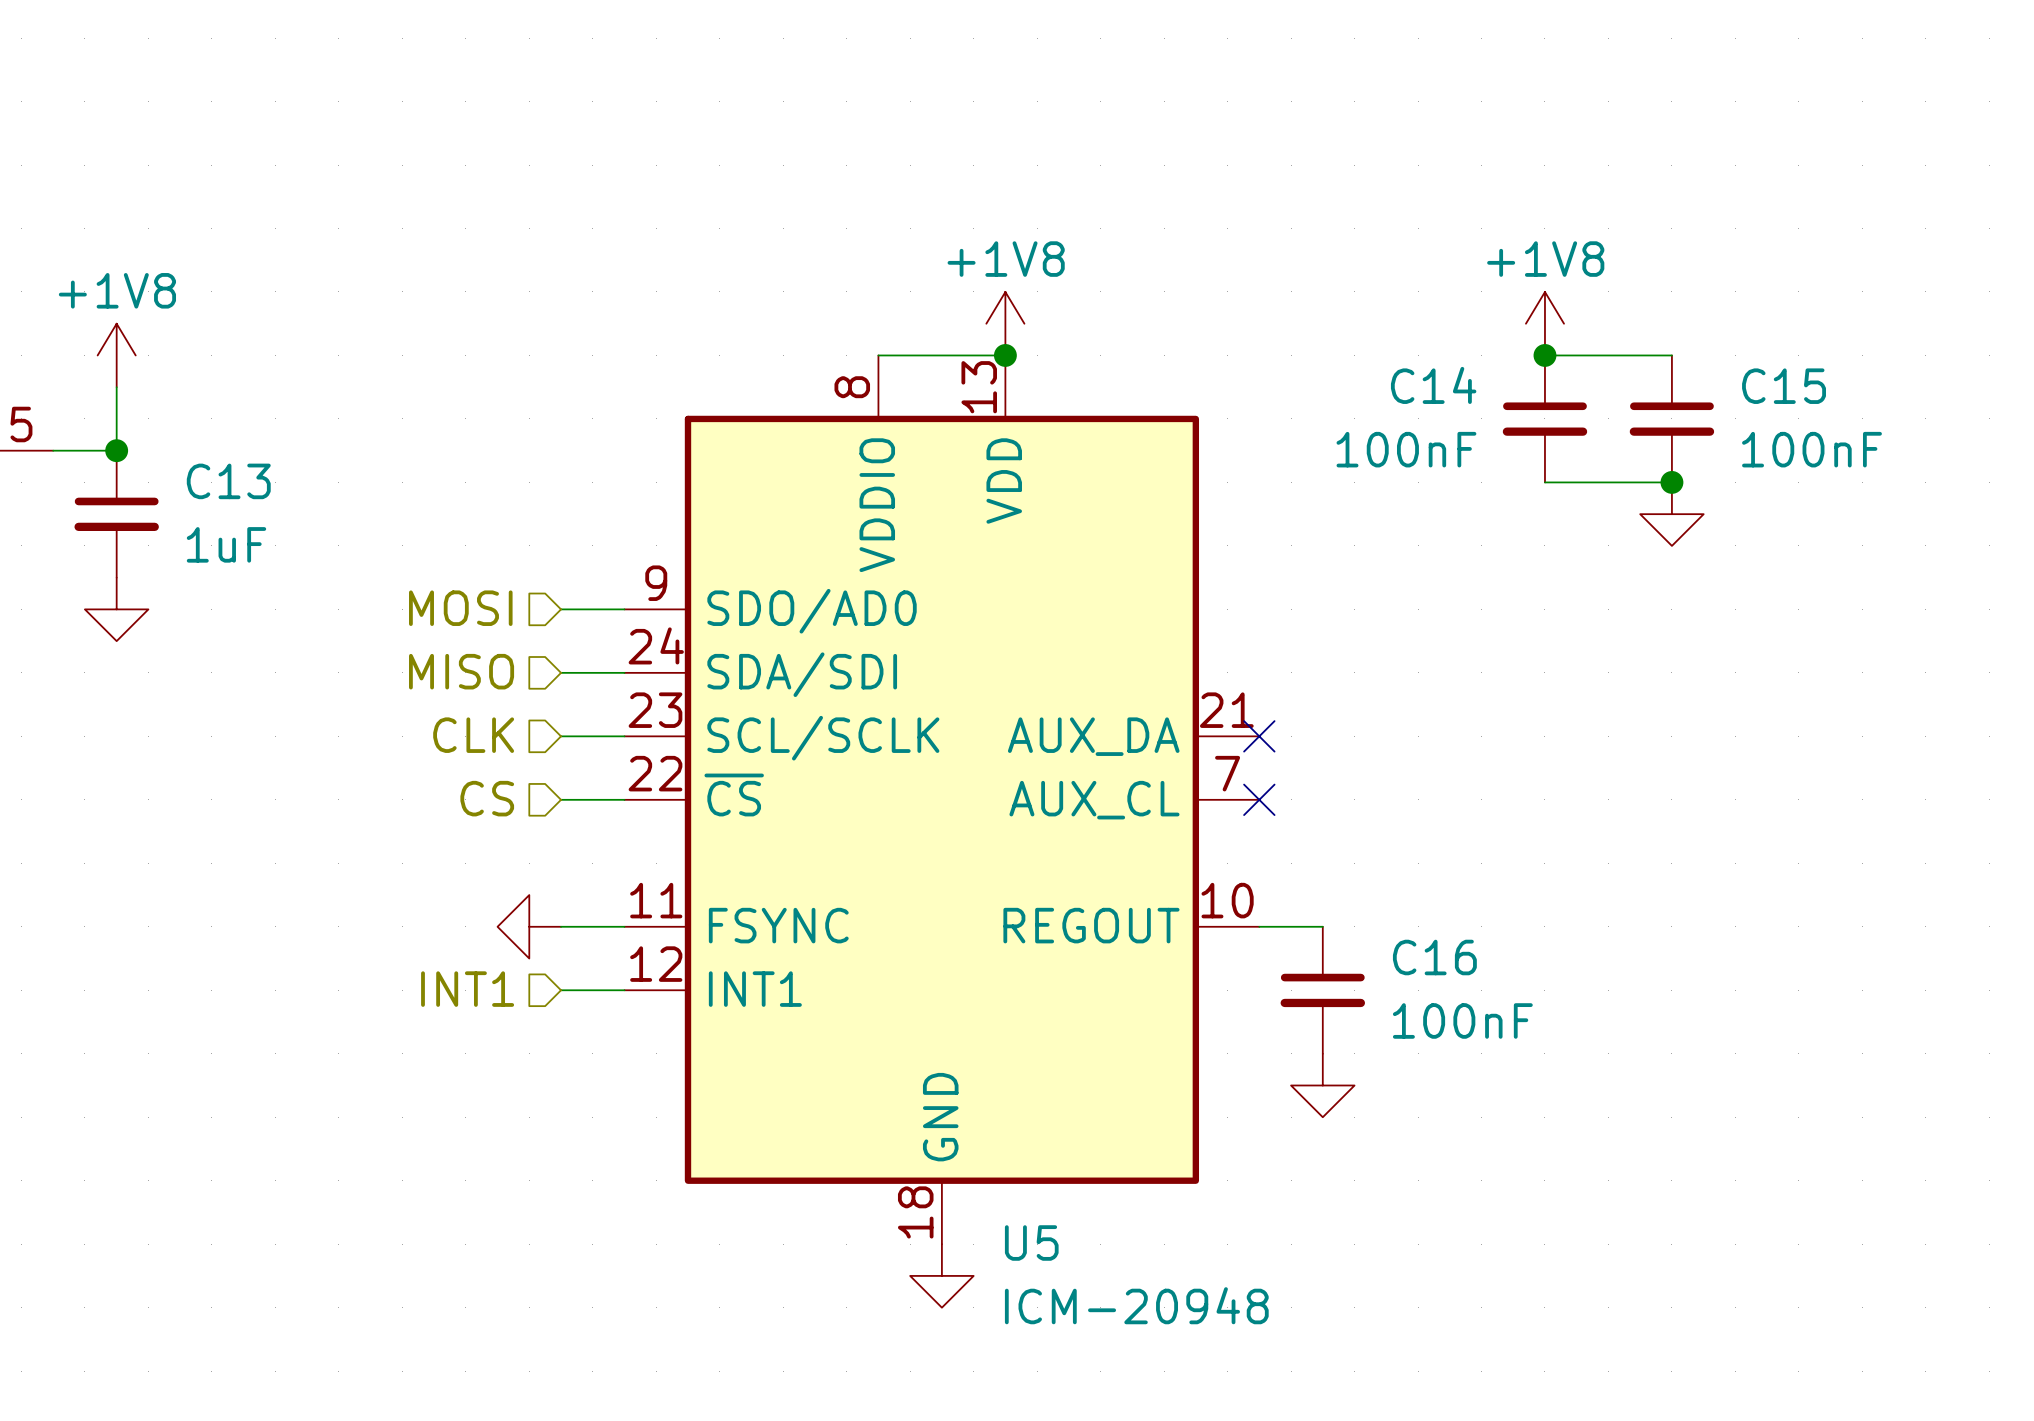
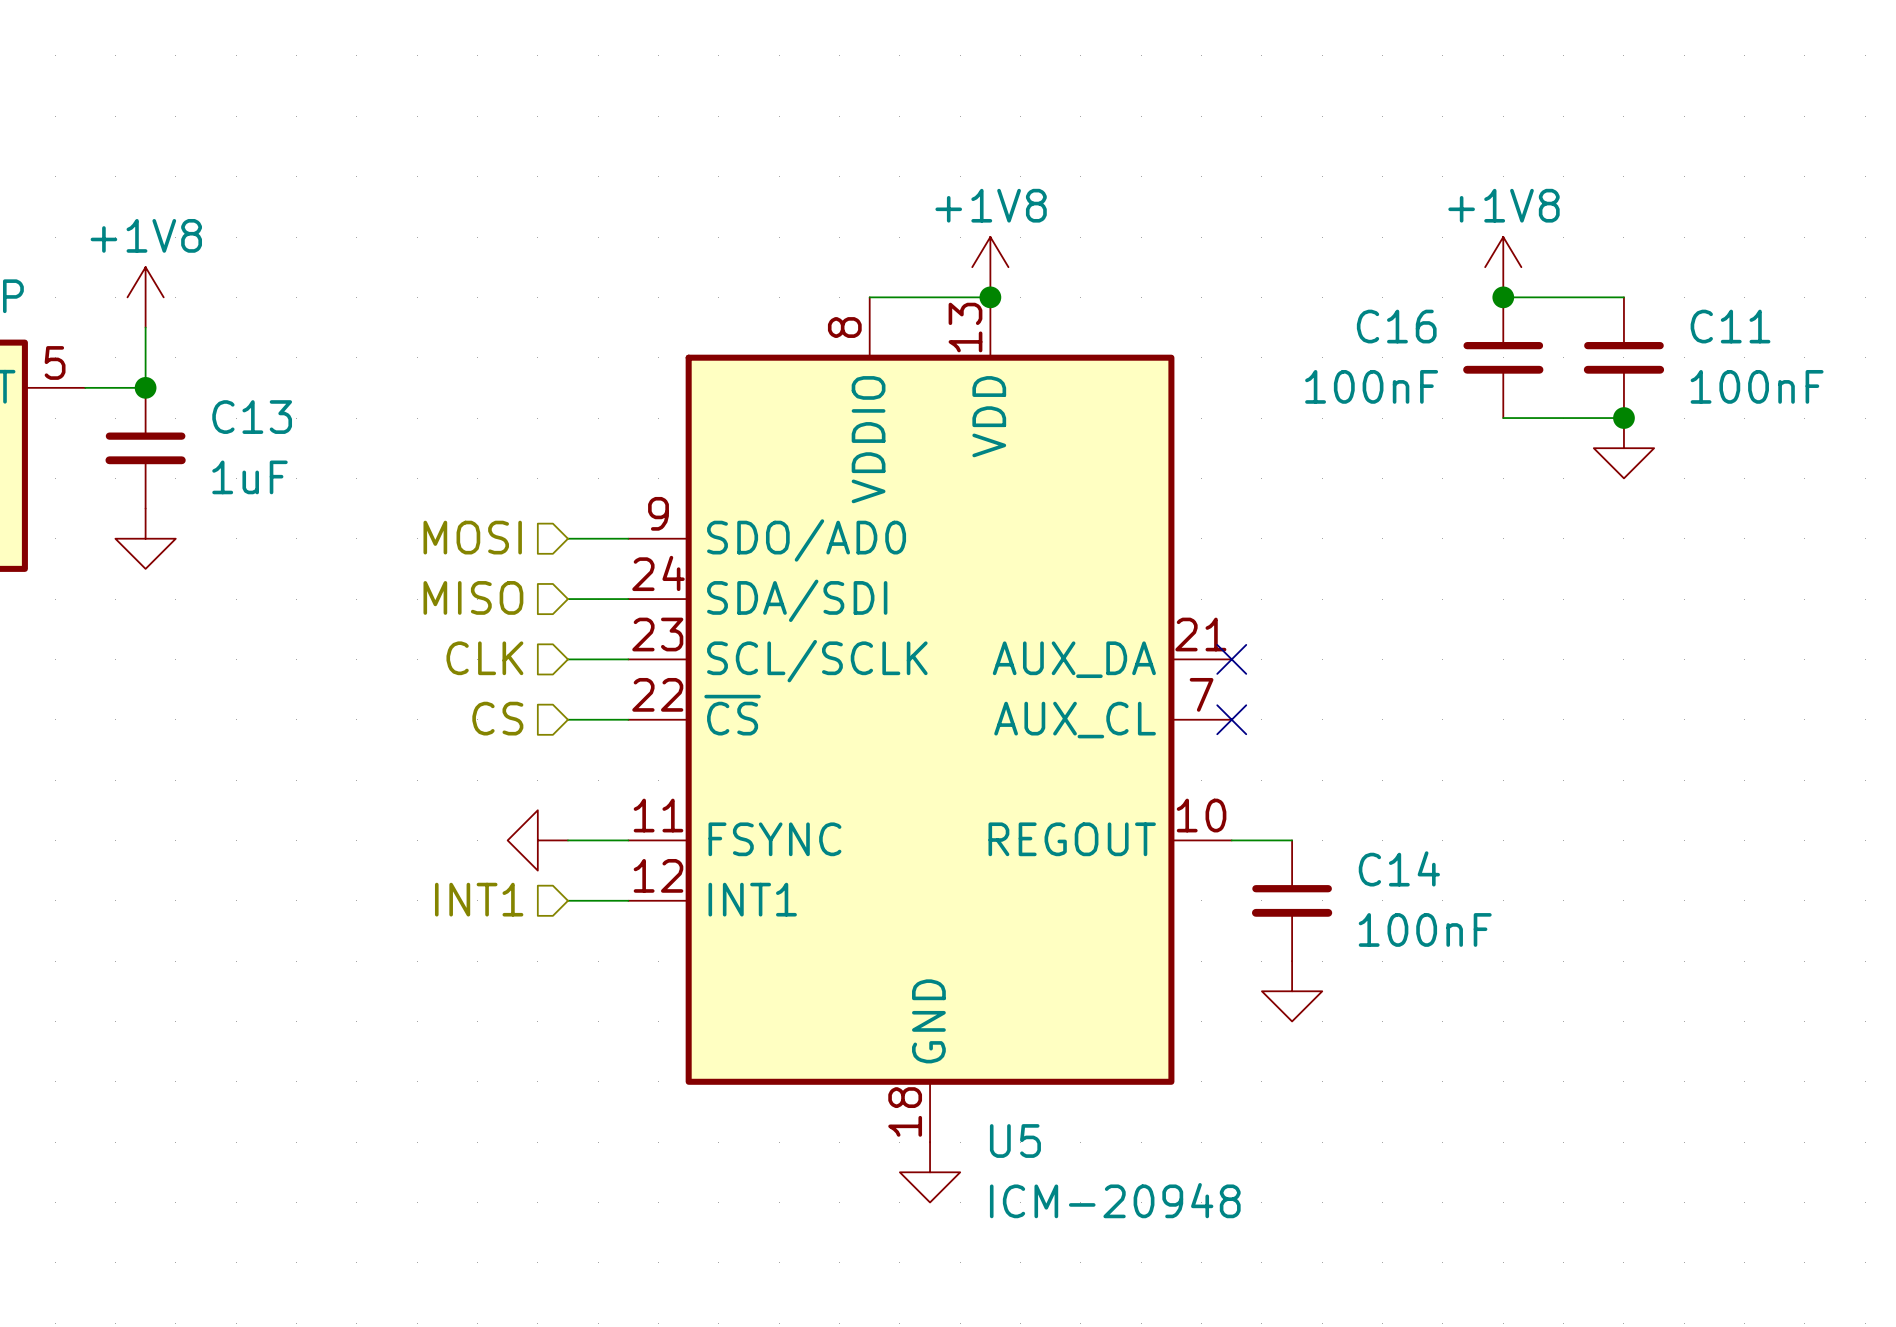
C14 name: C14 (1433, 385) -> C16 (1396, 326)
C15 name: C15 (1784, 386) -> C11 (1730, 326)
C16 name: C16 (1434, 957) -> C14 (1399, 868)

